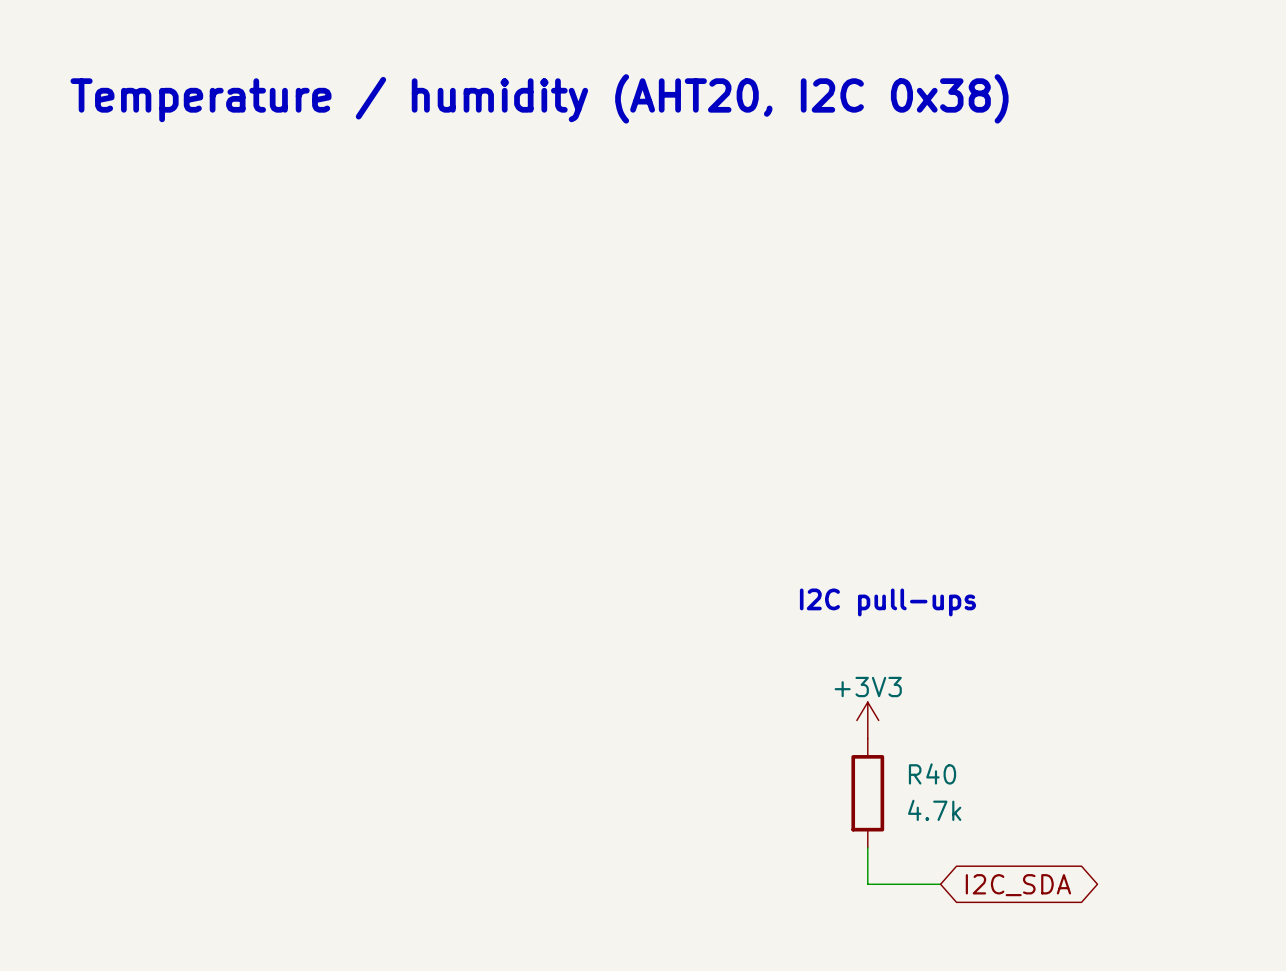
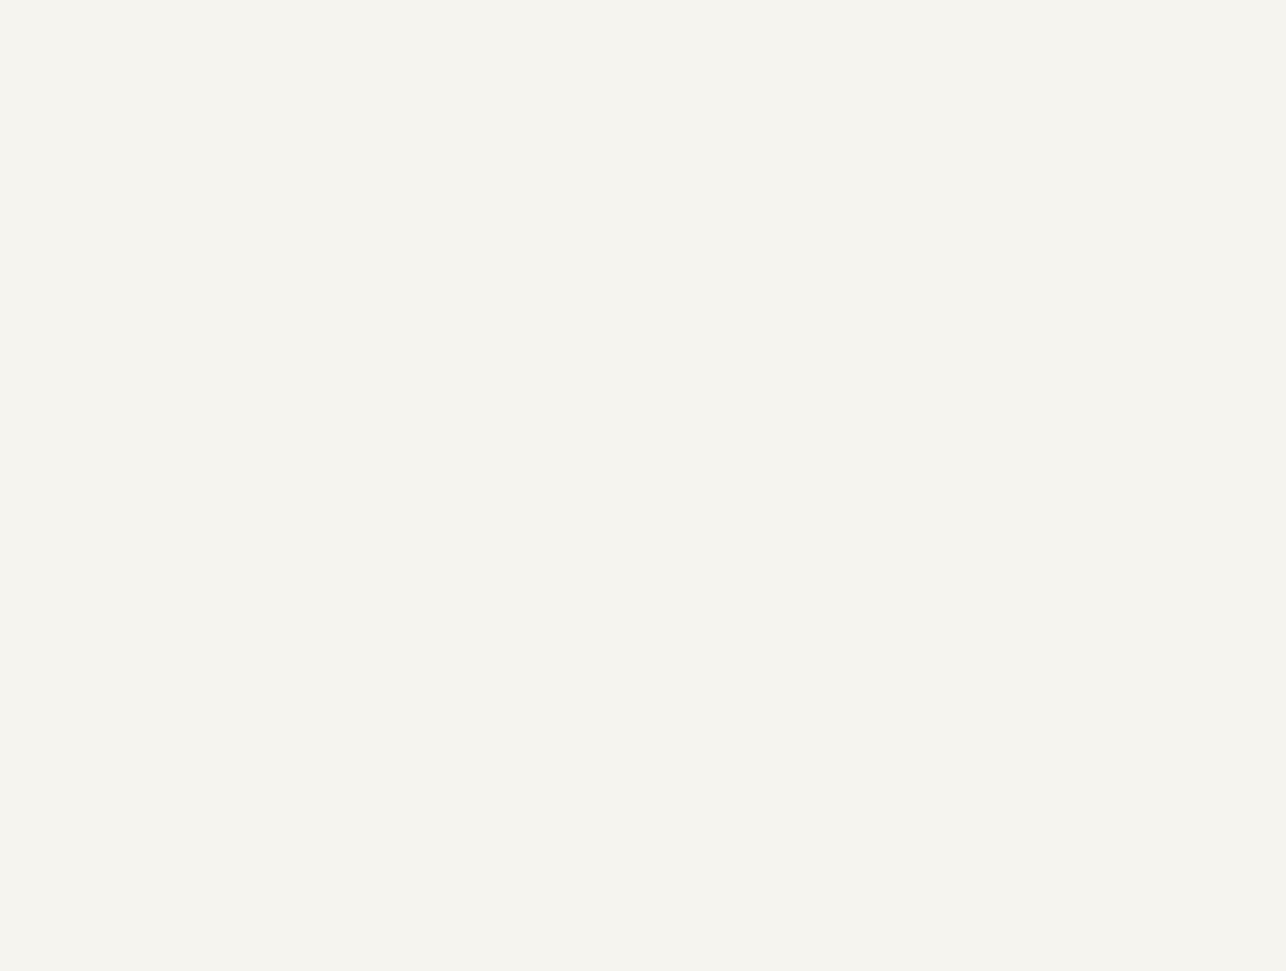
text: Temperature / humidity (AHT20, I2C 0x38) (539, 98) -> none
text: I2C pull-ups (887, 602) -> none
power symbol: +3V3 (867, 720) -> none
R40: 4.7k (867, 793) -> none
wire: (867, 847) (867, 884) (940, 884) -> none
global label: I2C_SDA (1018, 885) -> none

